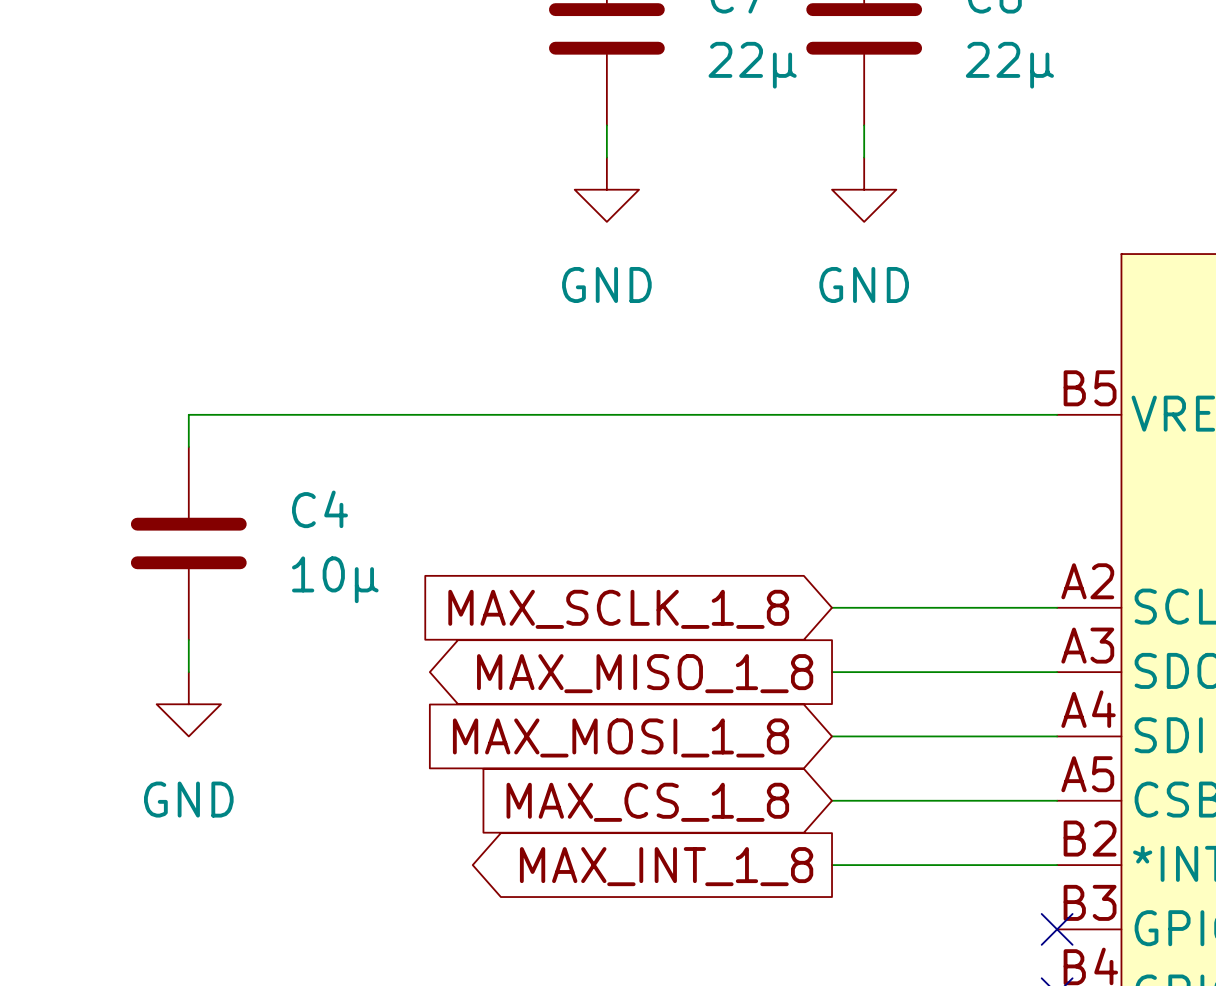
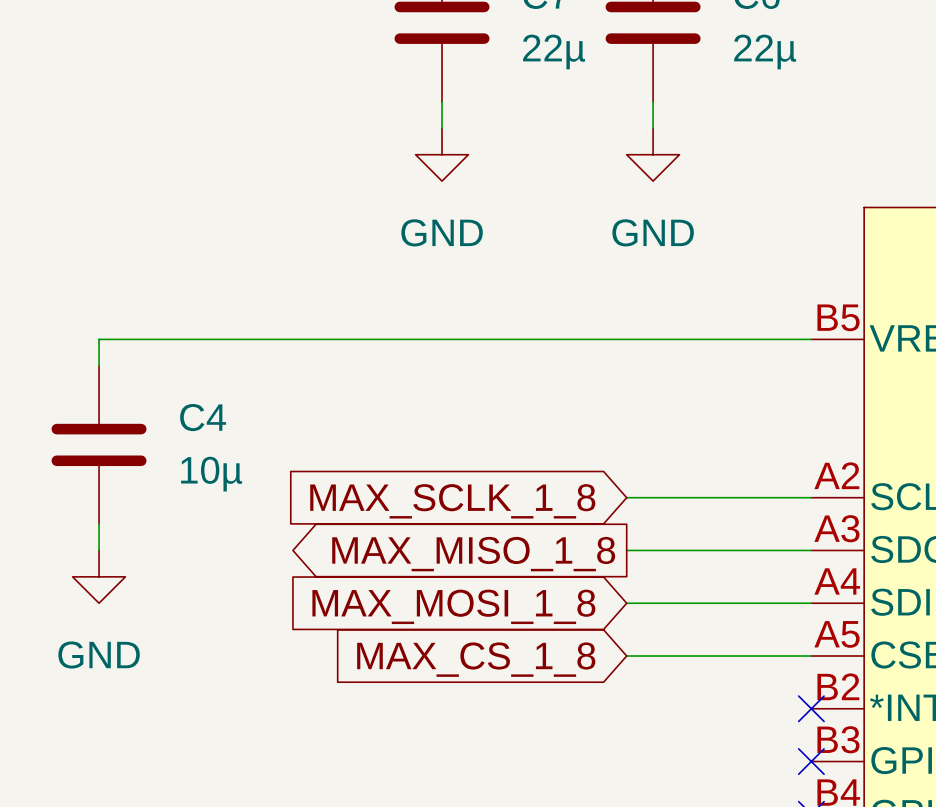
wire: (832, 865) (1057, 865) -> none
no-connect mark: none -> (811, 708)
global label: MAX_INT_1_8 (666, 866) -> none

